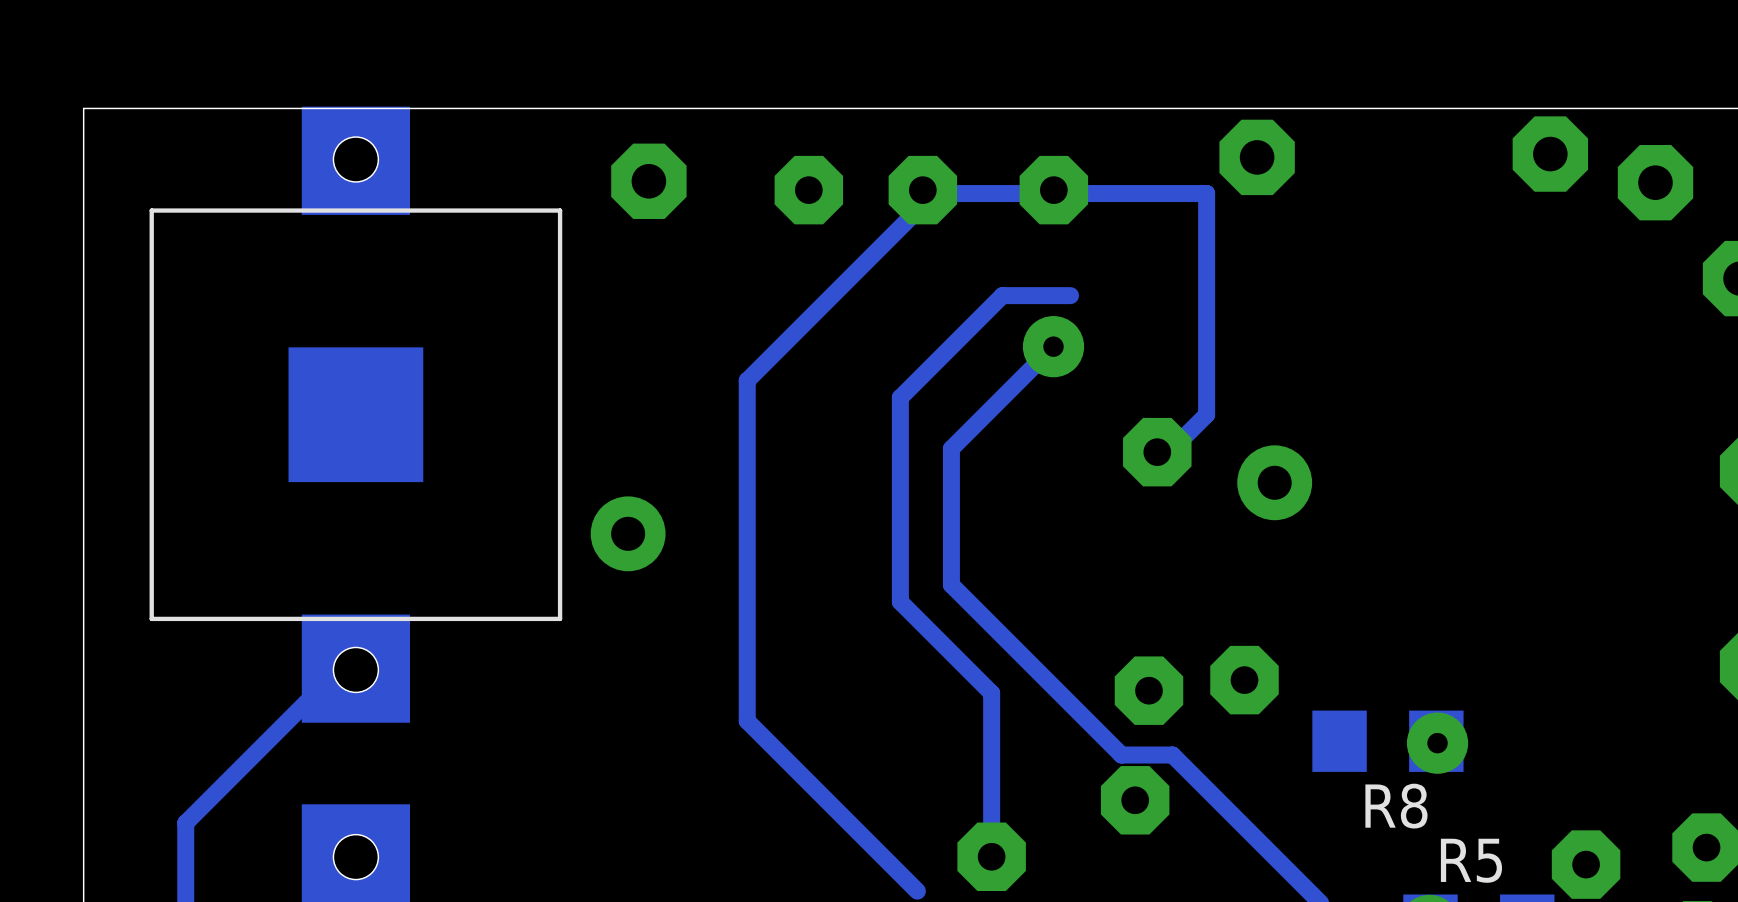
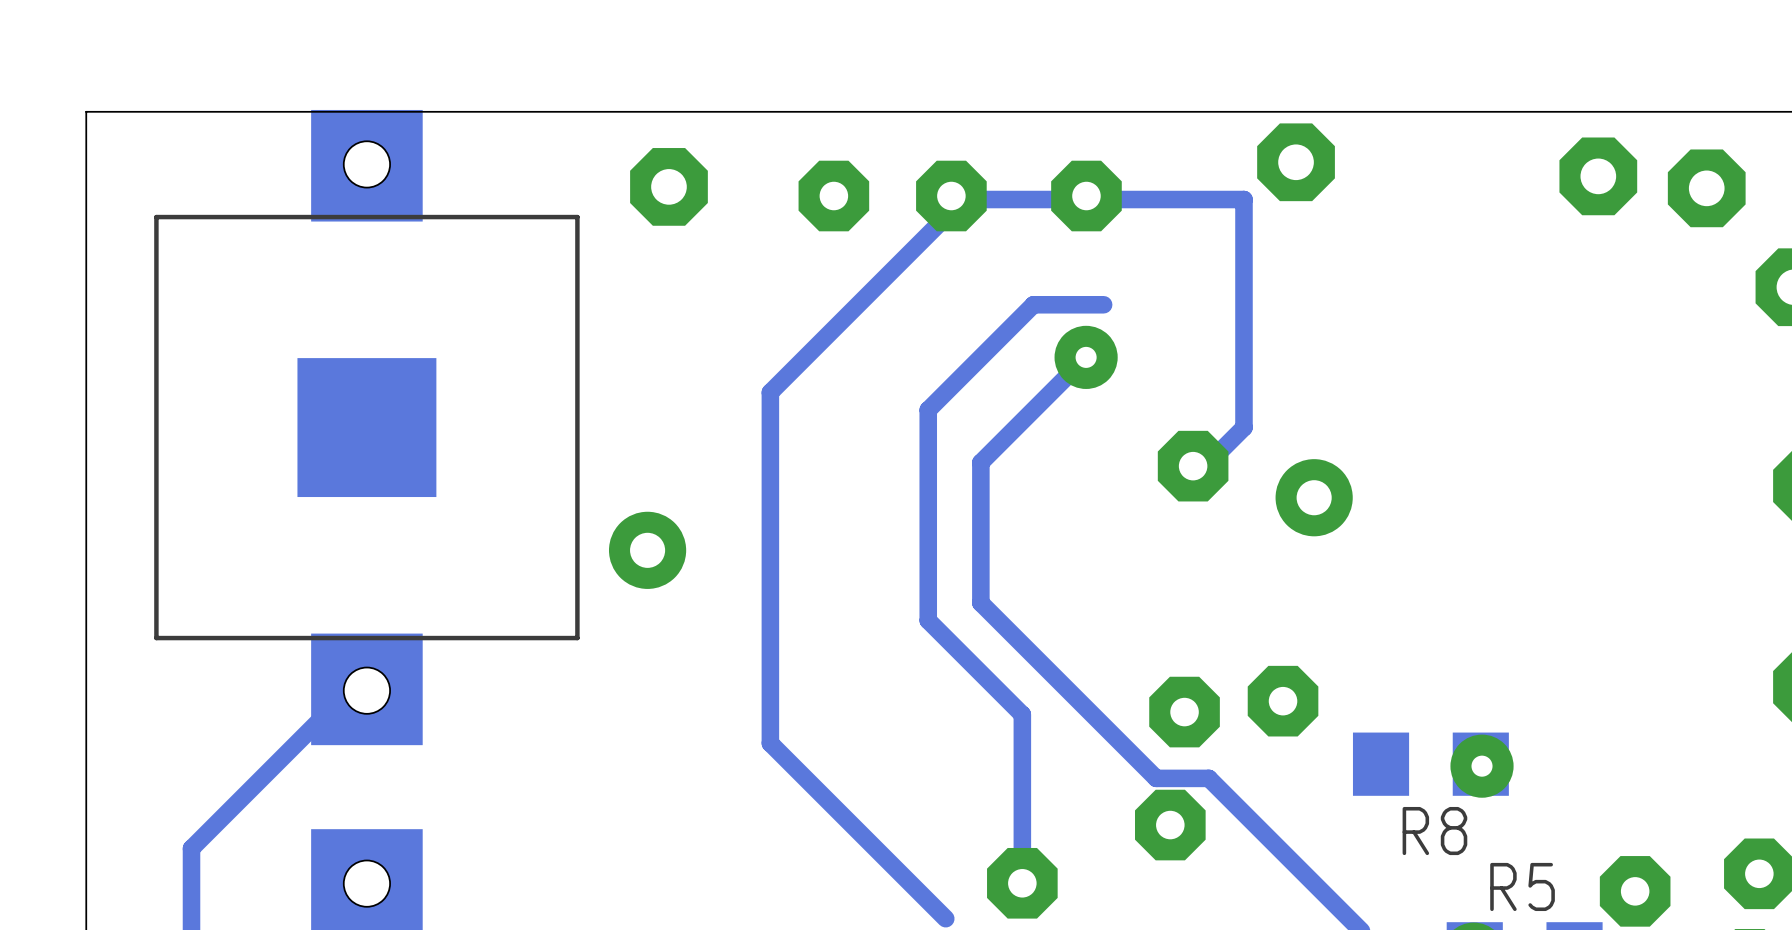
part position: (1550, 154) -> (1598, 176)

